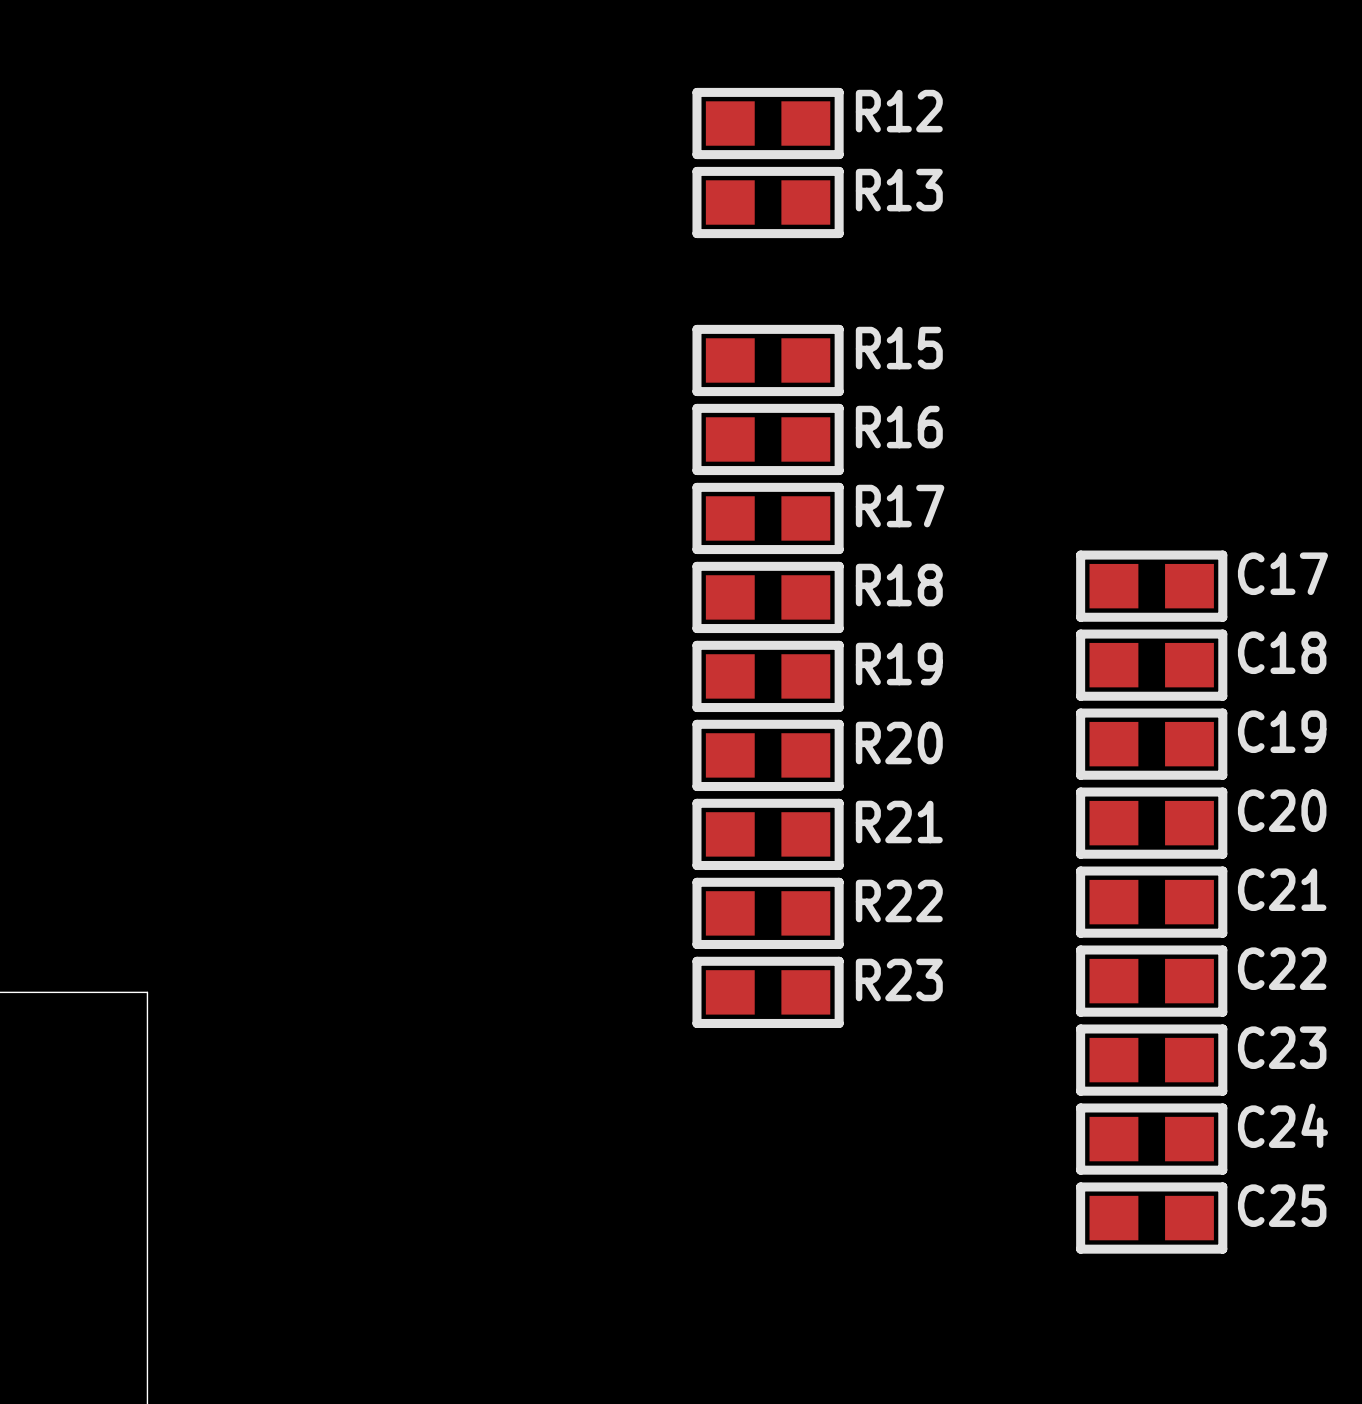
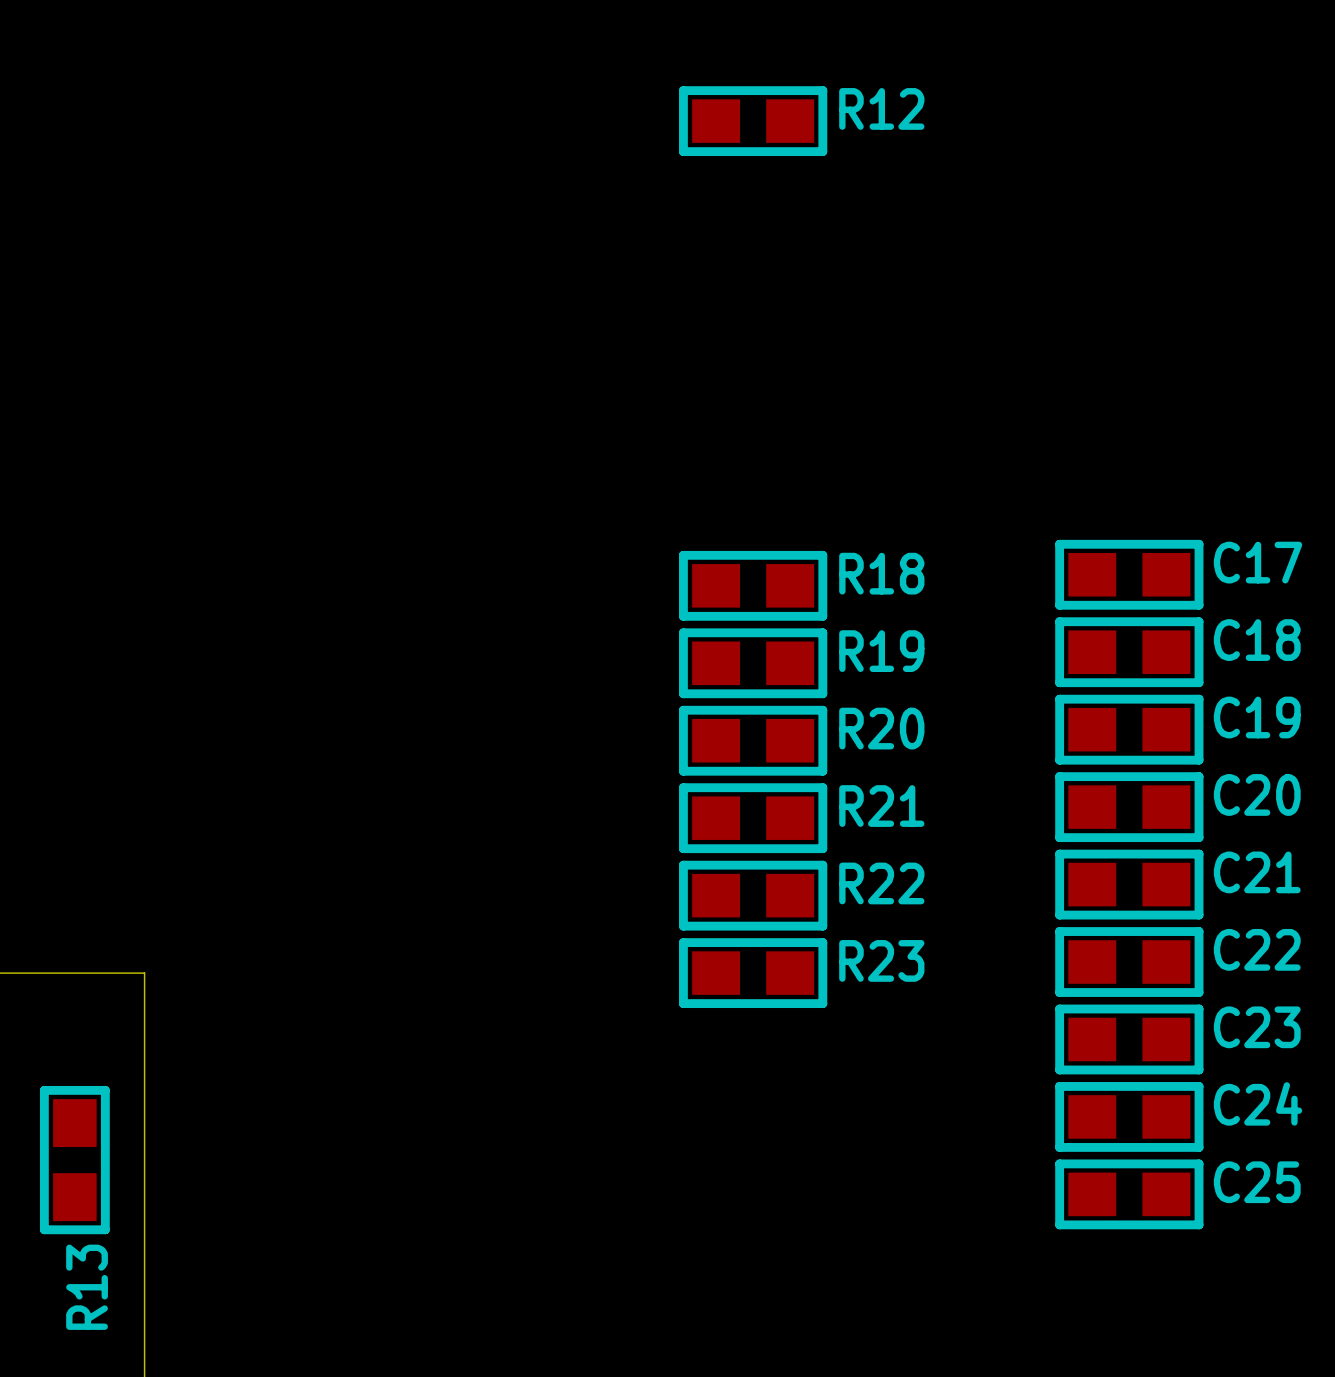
R13 rotation: 0° (768, 202) -> 90° clockwise (74, 1160)
R13 position: (768, 202) -> (74, 1160)
R15: (768, 360) -> none
R16: (768, 439) -> none
R17: (768, 518) -> none

